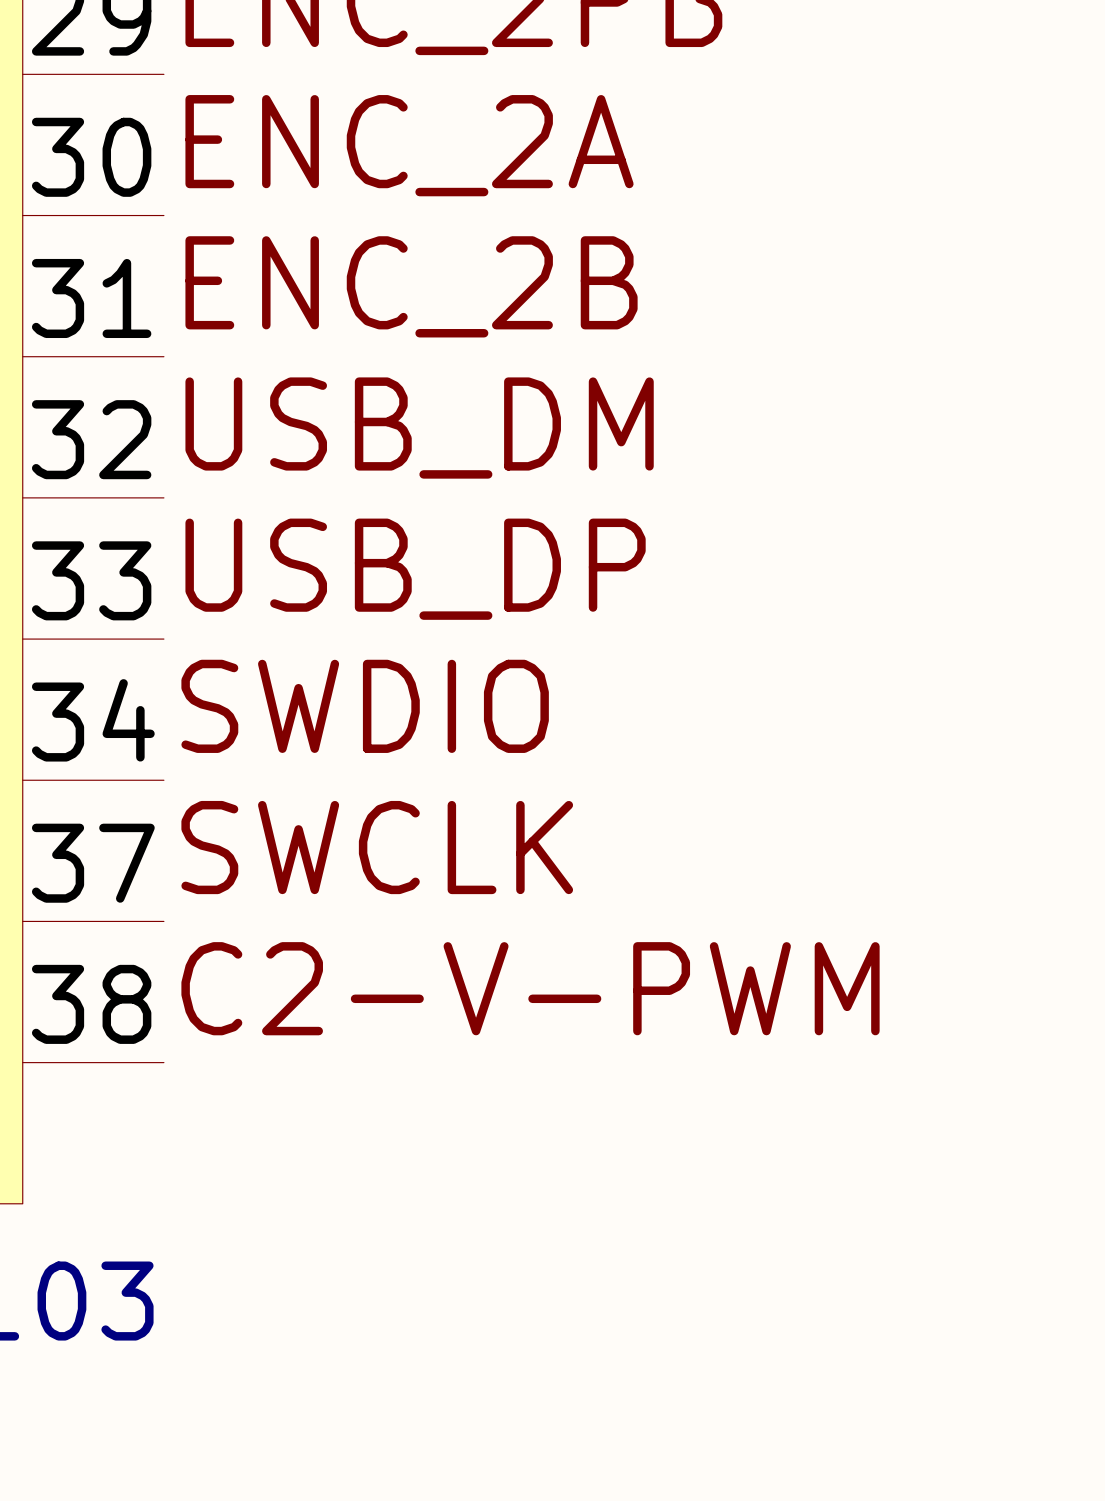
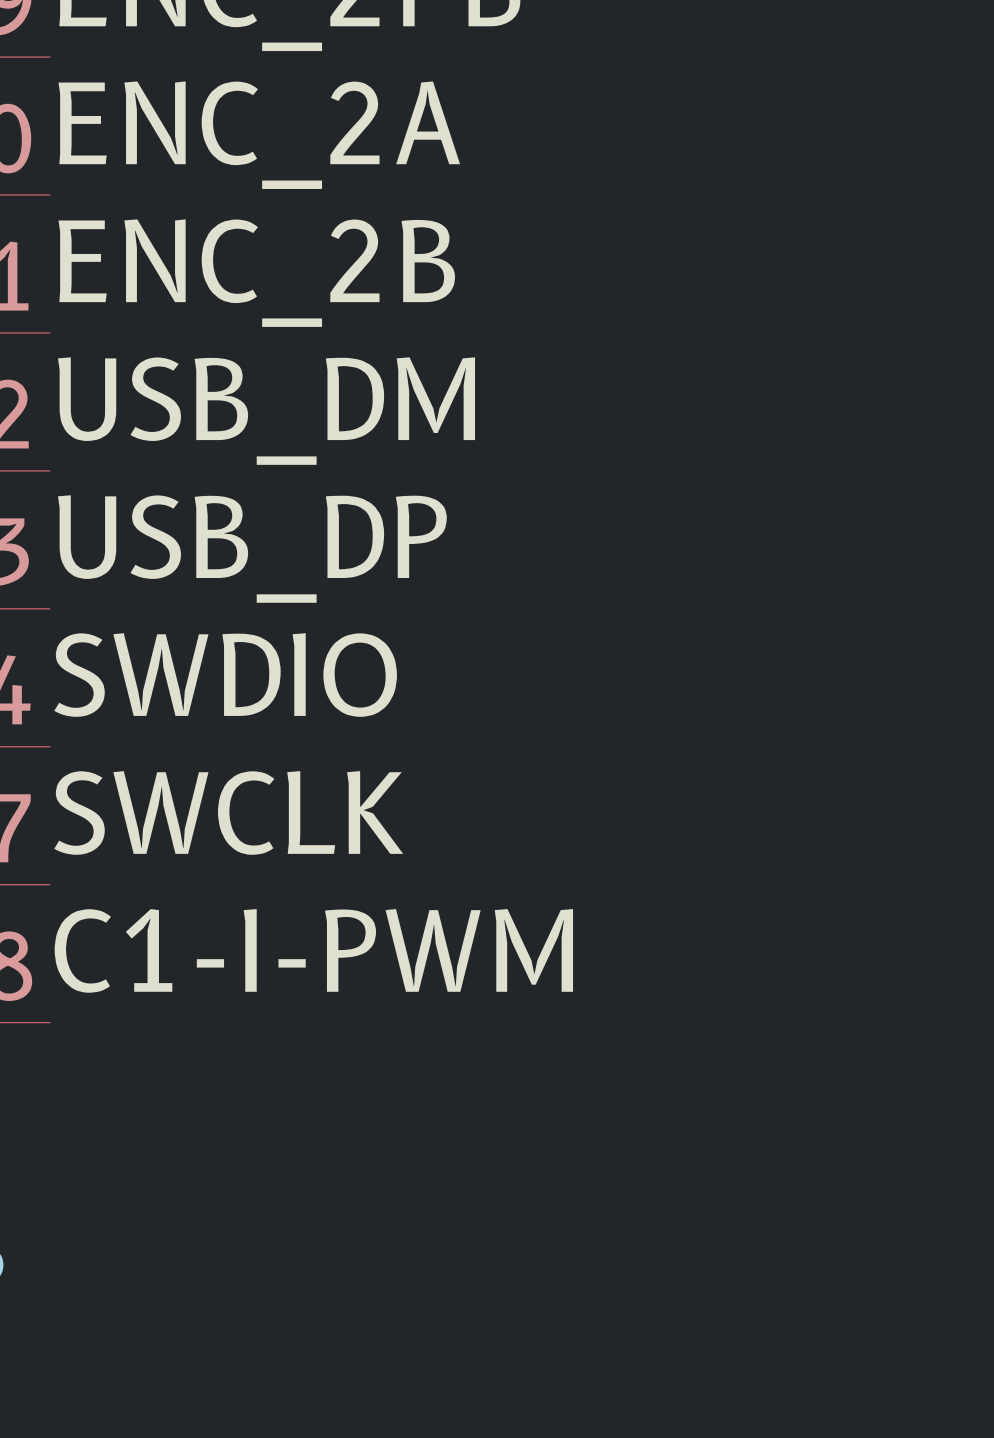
label: C2-V-PWM (530, 988) -> C1-I-PWM (313, 950)

